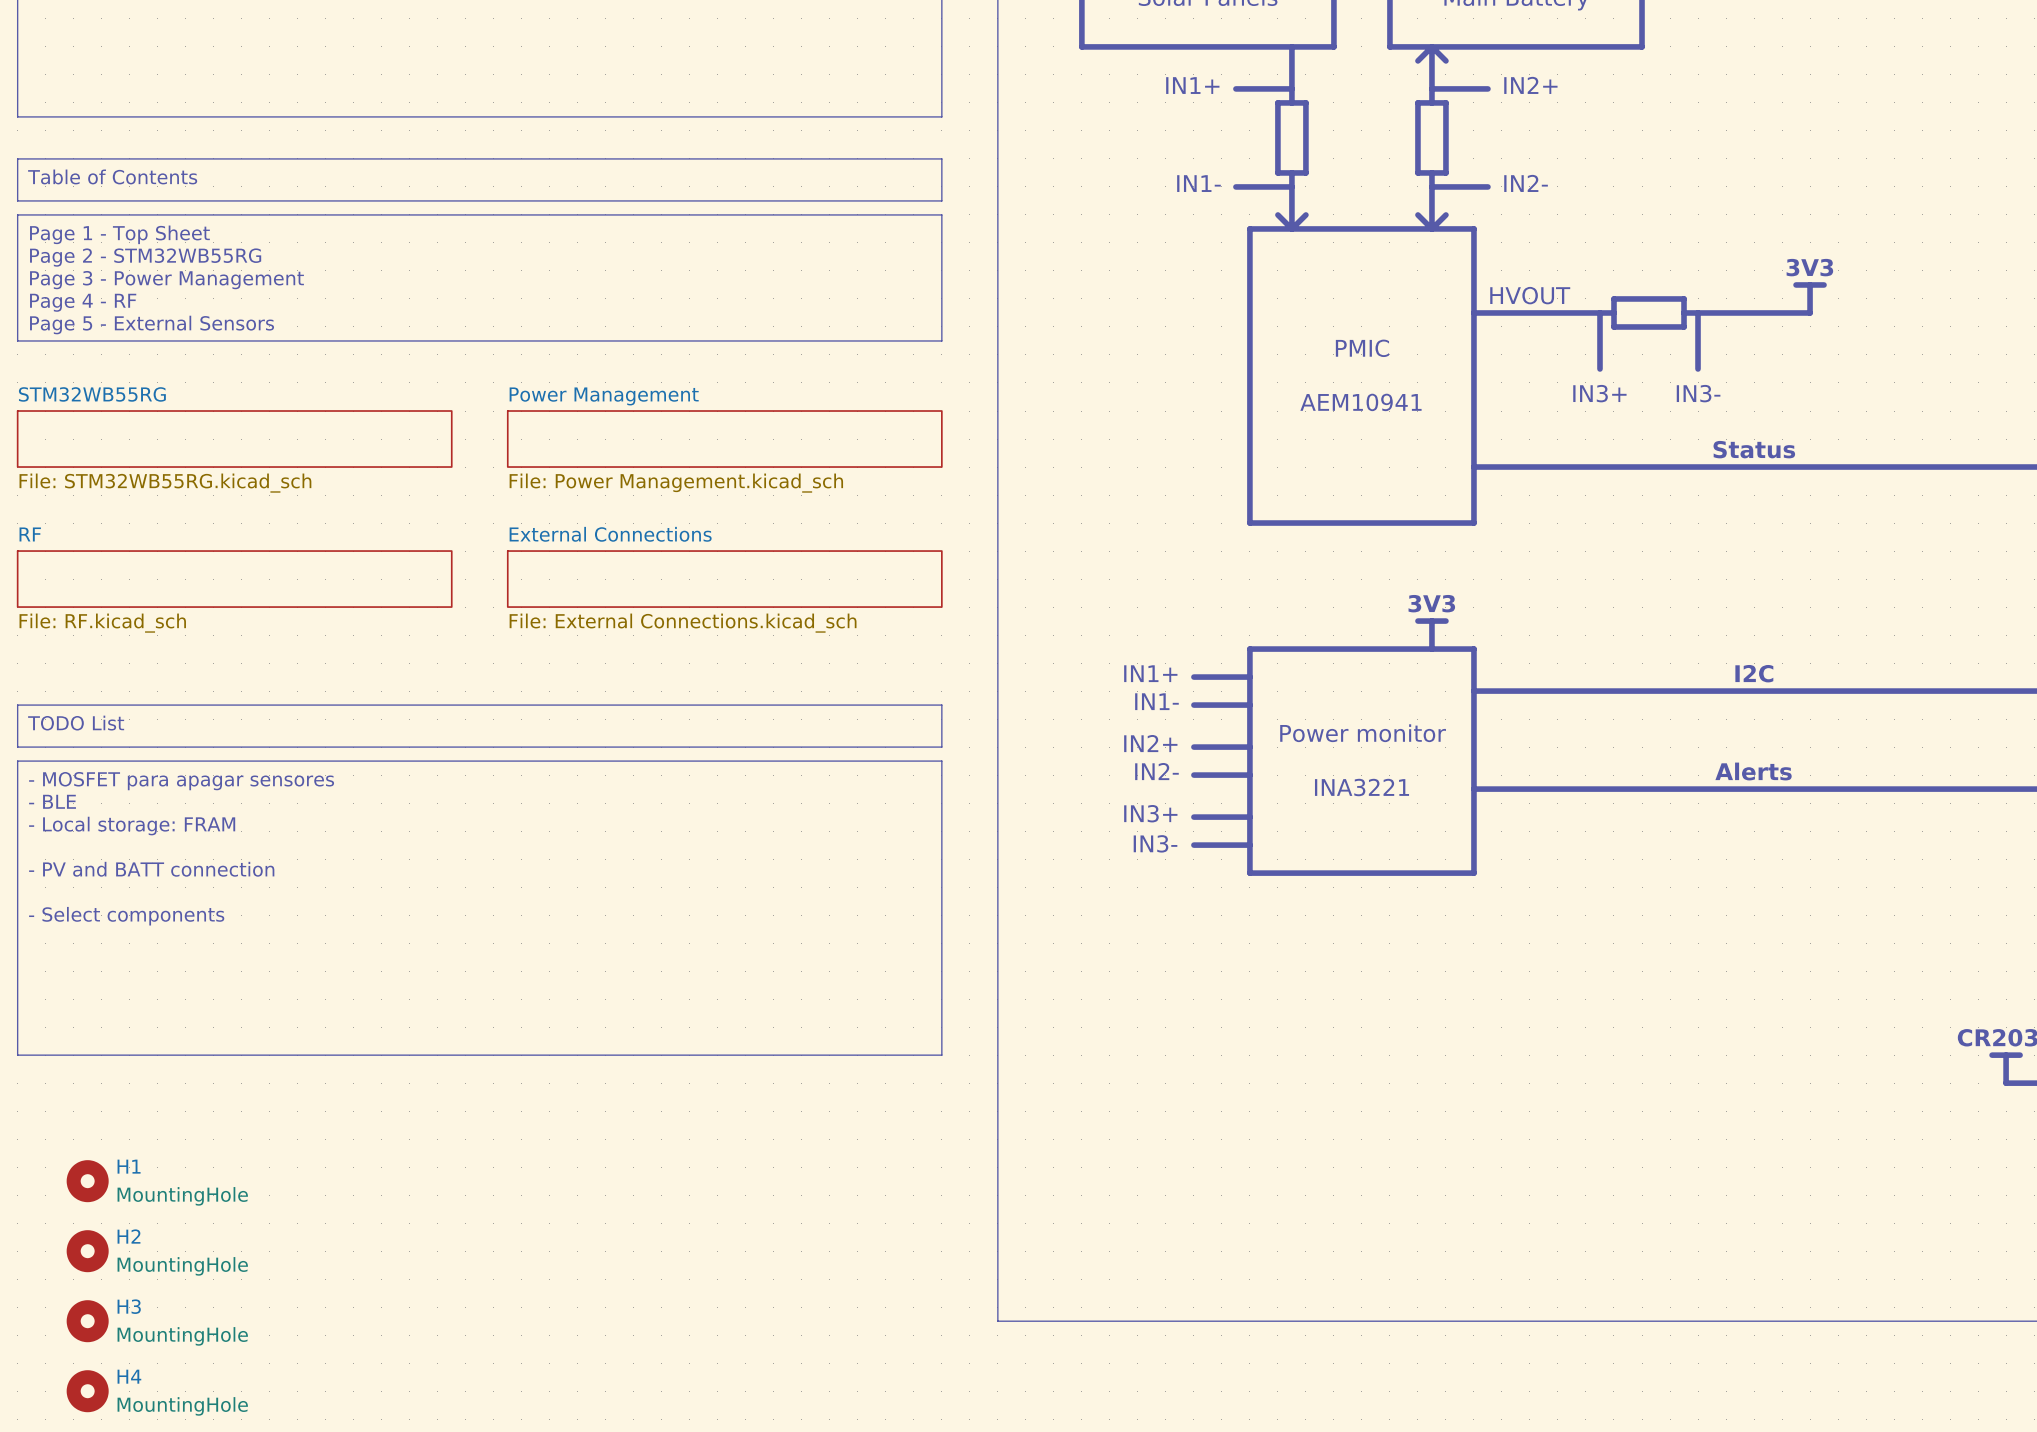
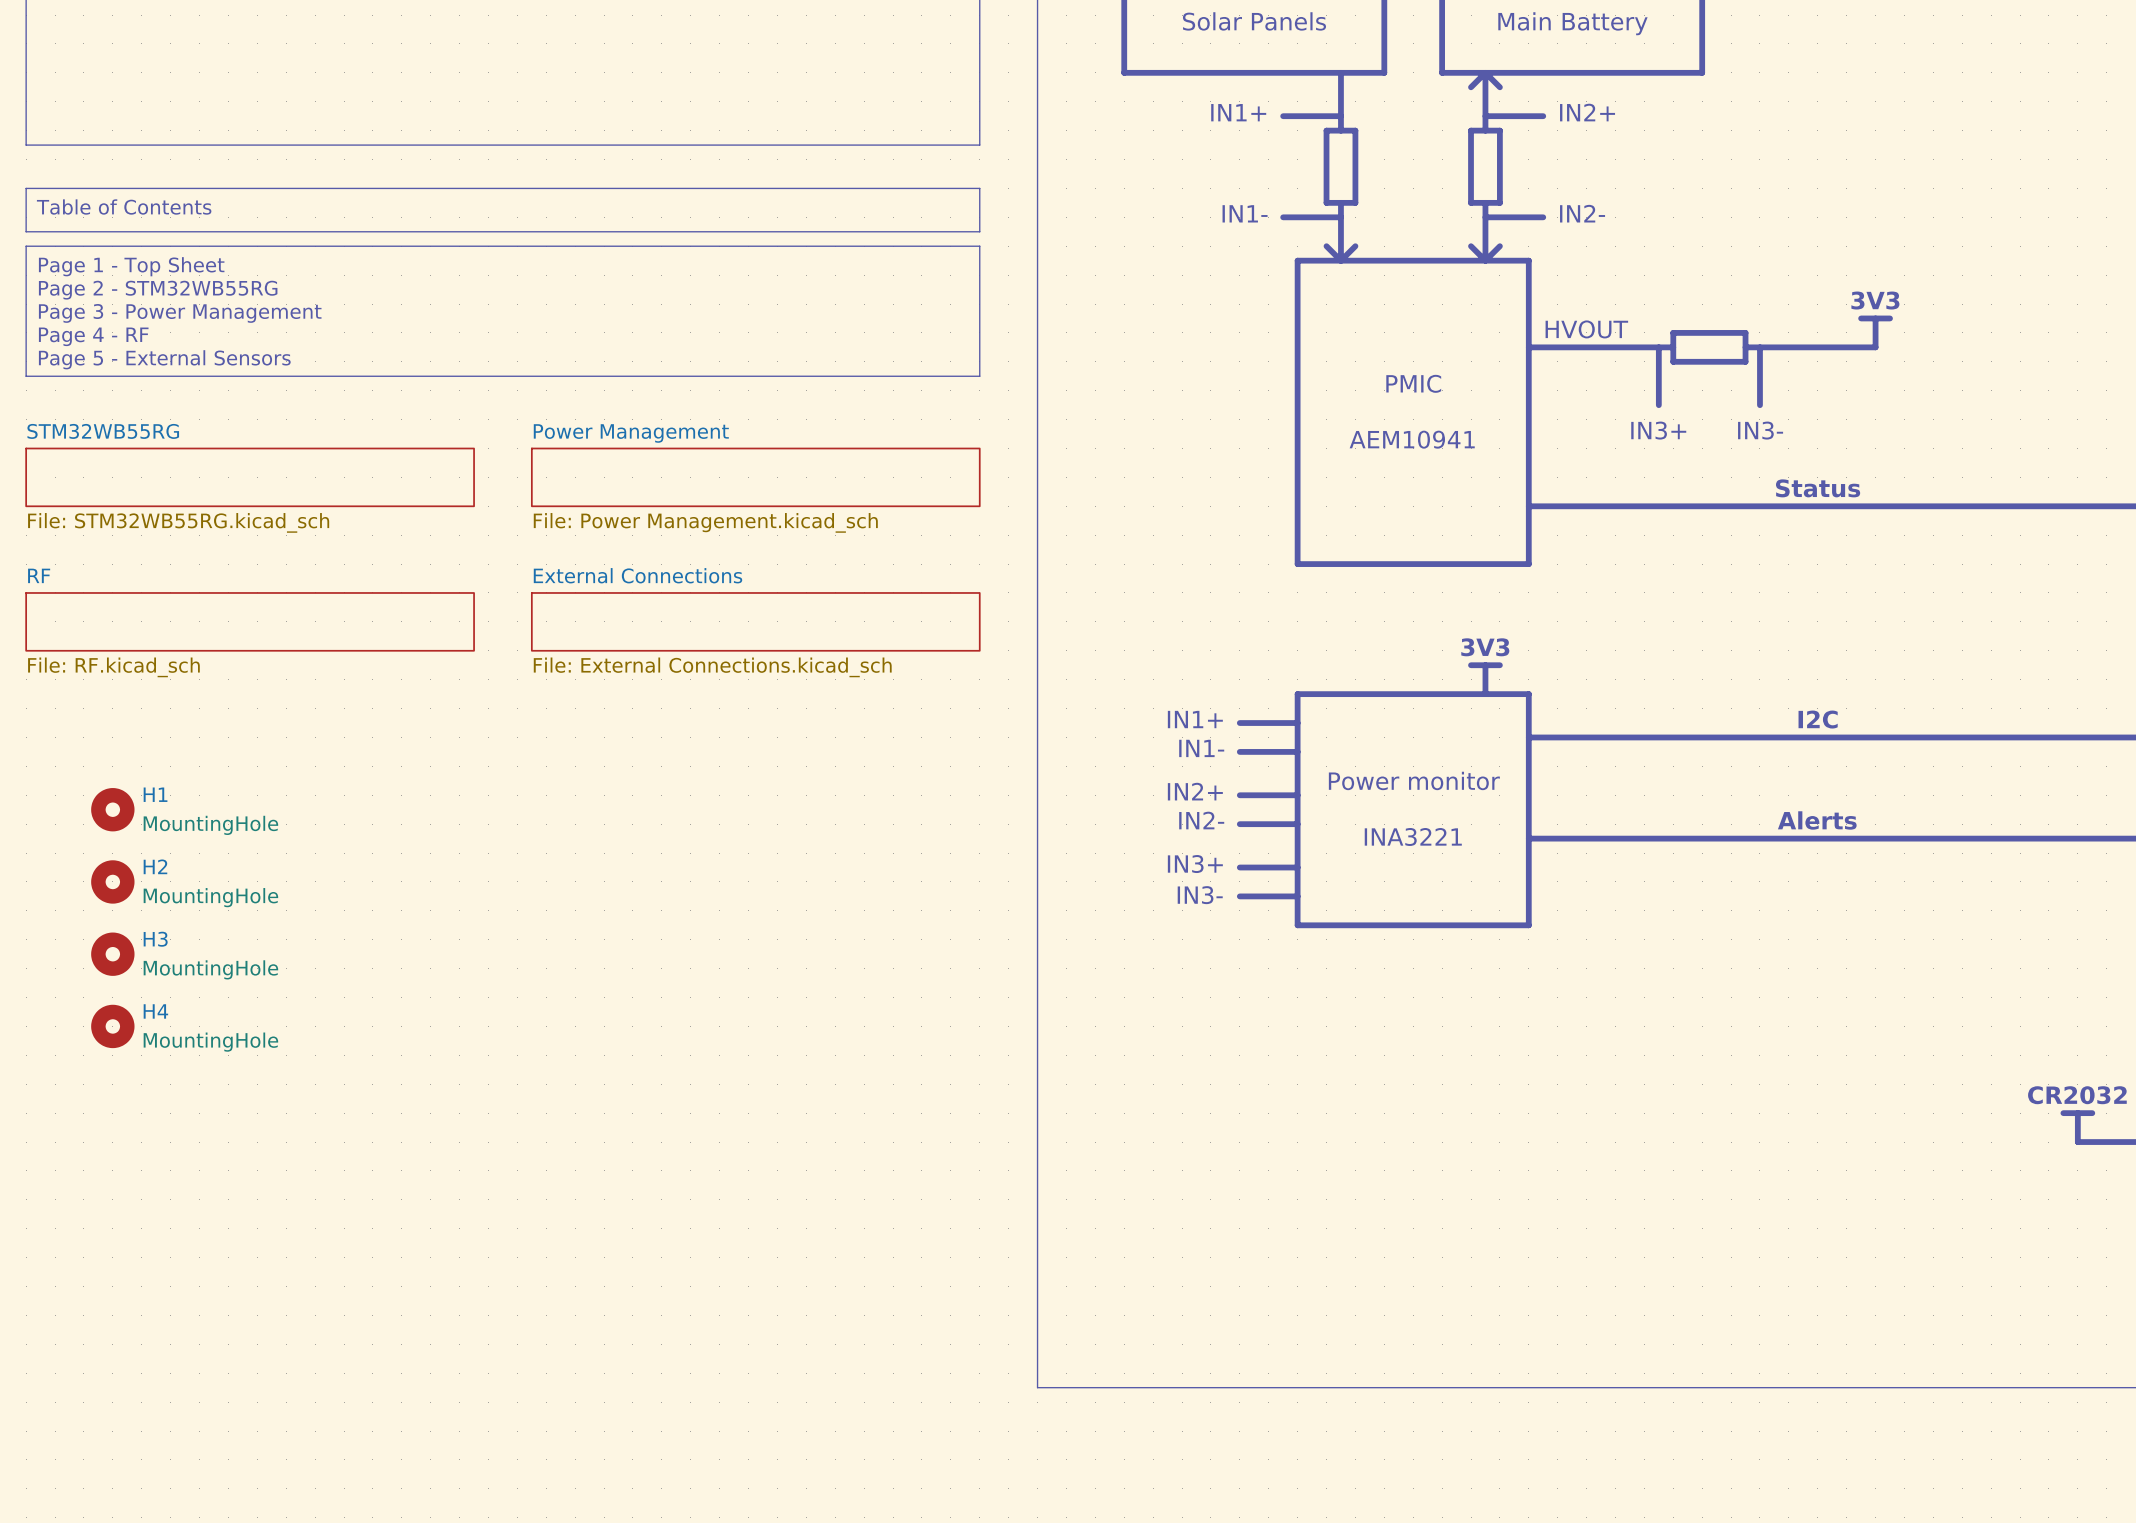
line: (17, 705) (941, 705) (941, 747) (17, 747) (17, 705) -> none
text: TODO List (76, 723) -> none
line: (17, 761) (17, 1055) (941, 1055) (941, 761) (17, 761) -> none
text: - MOSFET para apagar sensores (181, 781) -> none
text: - BLE (52, 801) -> none
text: - Local storage: FRAM (132, 826) -> none
text: - PV and BATT connection (151, 869) -> none
text: - Select components (126, 916) -> none
H1 position: (87, 1181) -> (112, 809)
H2 position: (87, 1251) -> (112, 881)
H3 position: (87, 1321) -> (112, 954)
H4 position: (87, 1391) -> (112, 1026)

